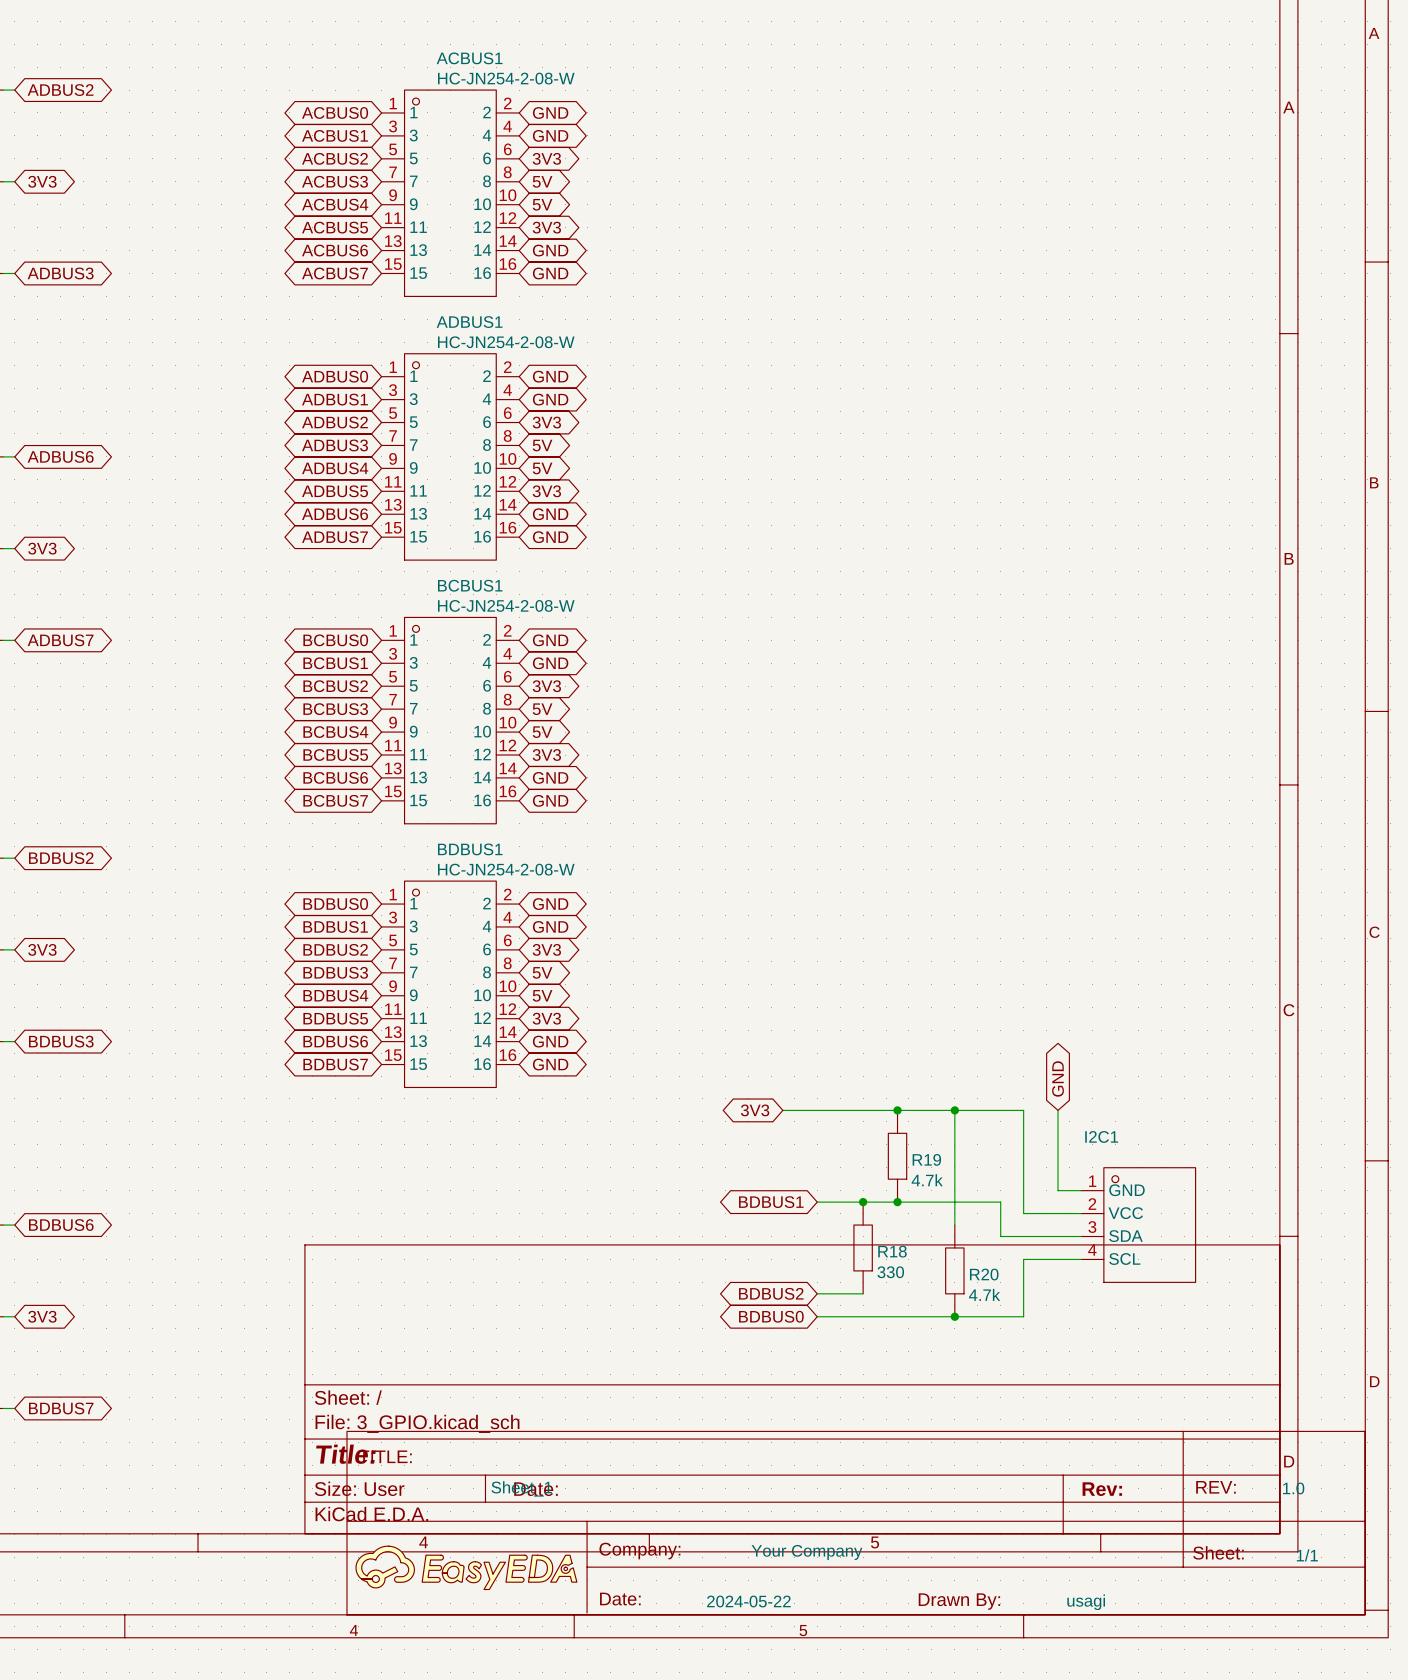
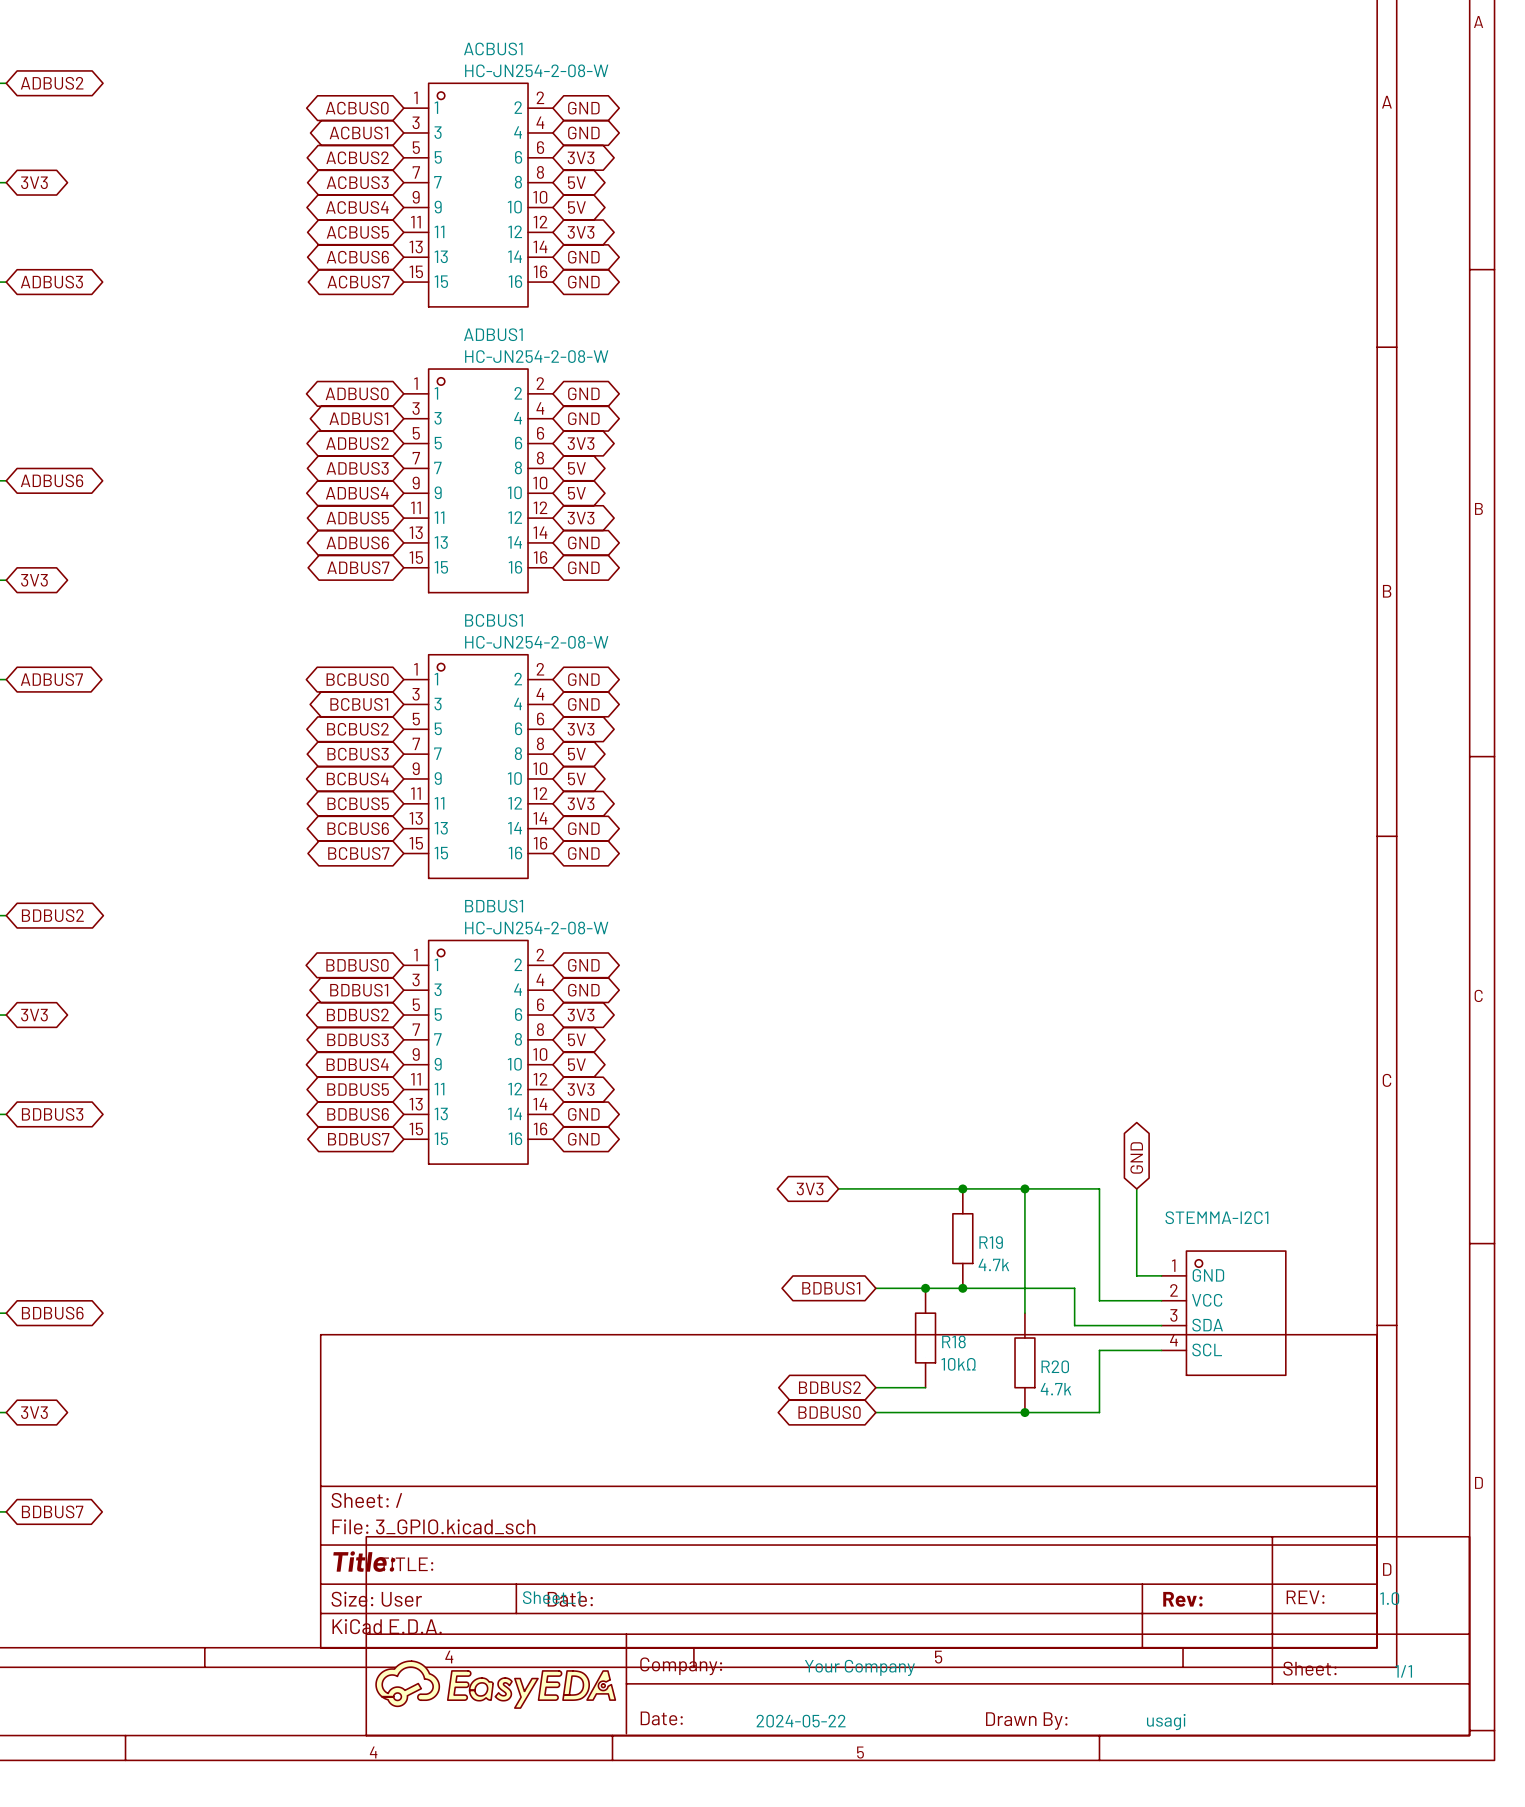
I2C1 name: I2C1 (1101, 1136) -> STEMMA-I2C1 (1216, 1217)
R18 value: 330 (890, 1272) -> 10kΩ (958, 1364)

